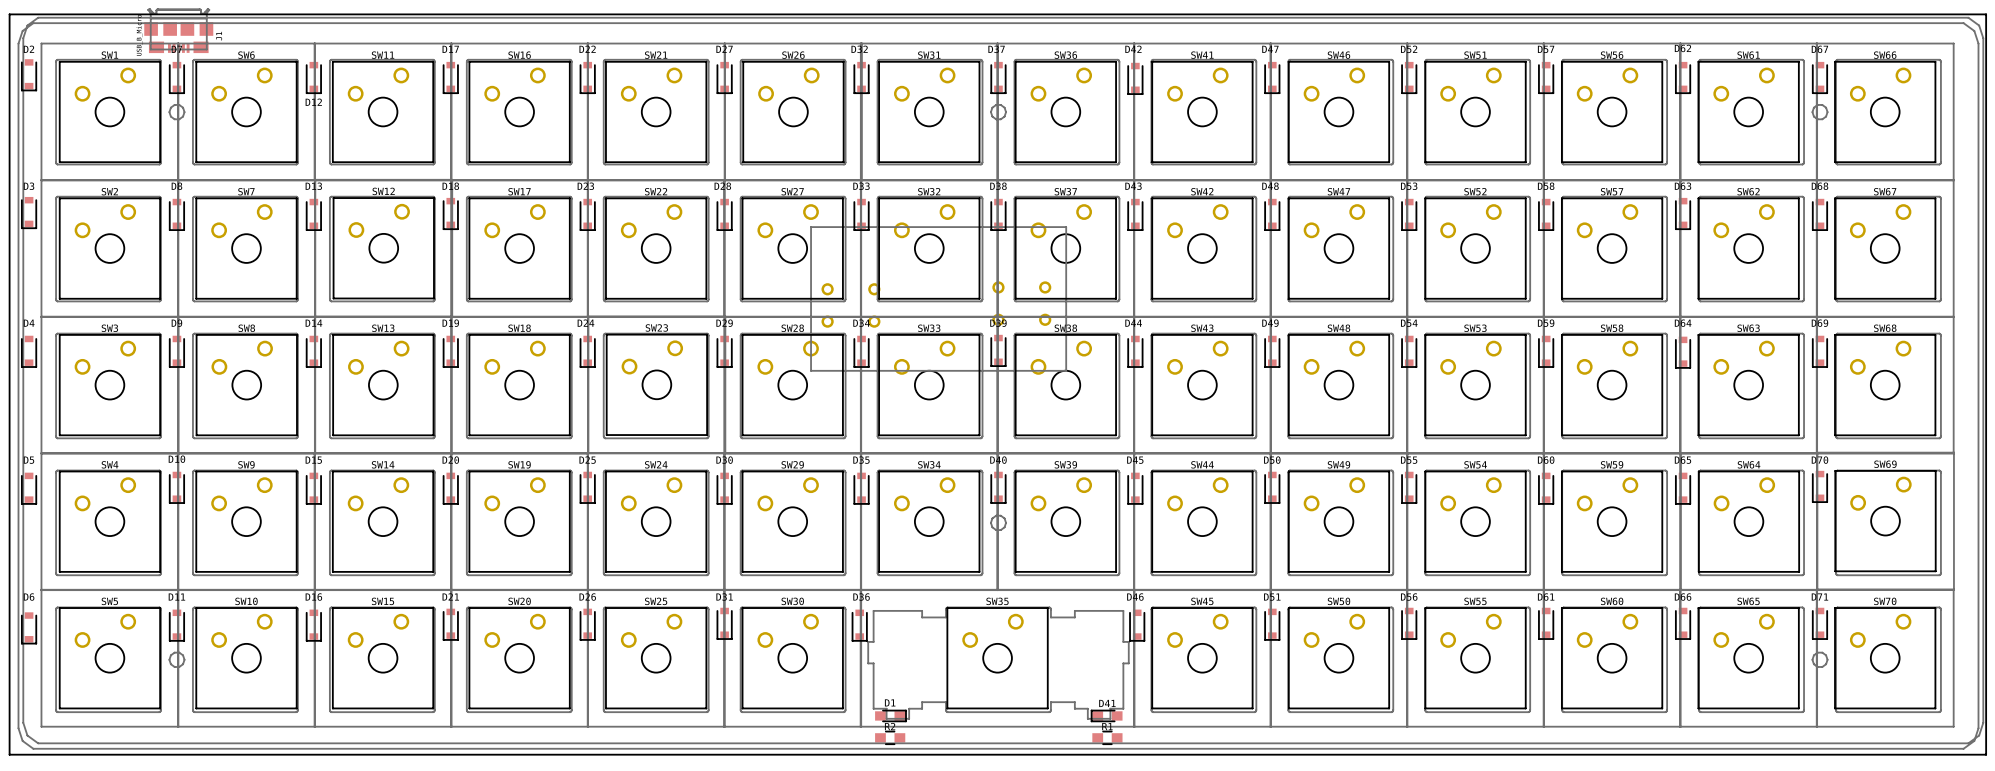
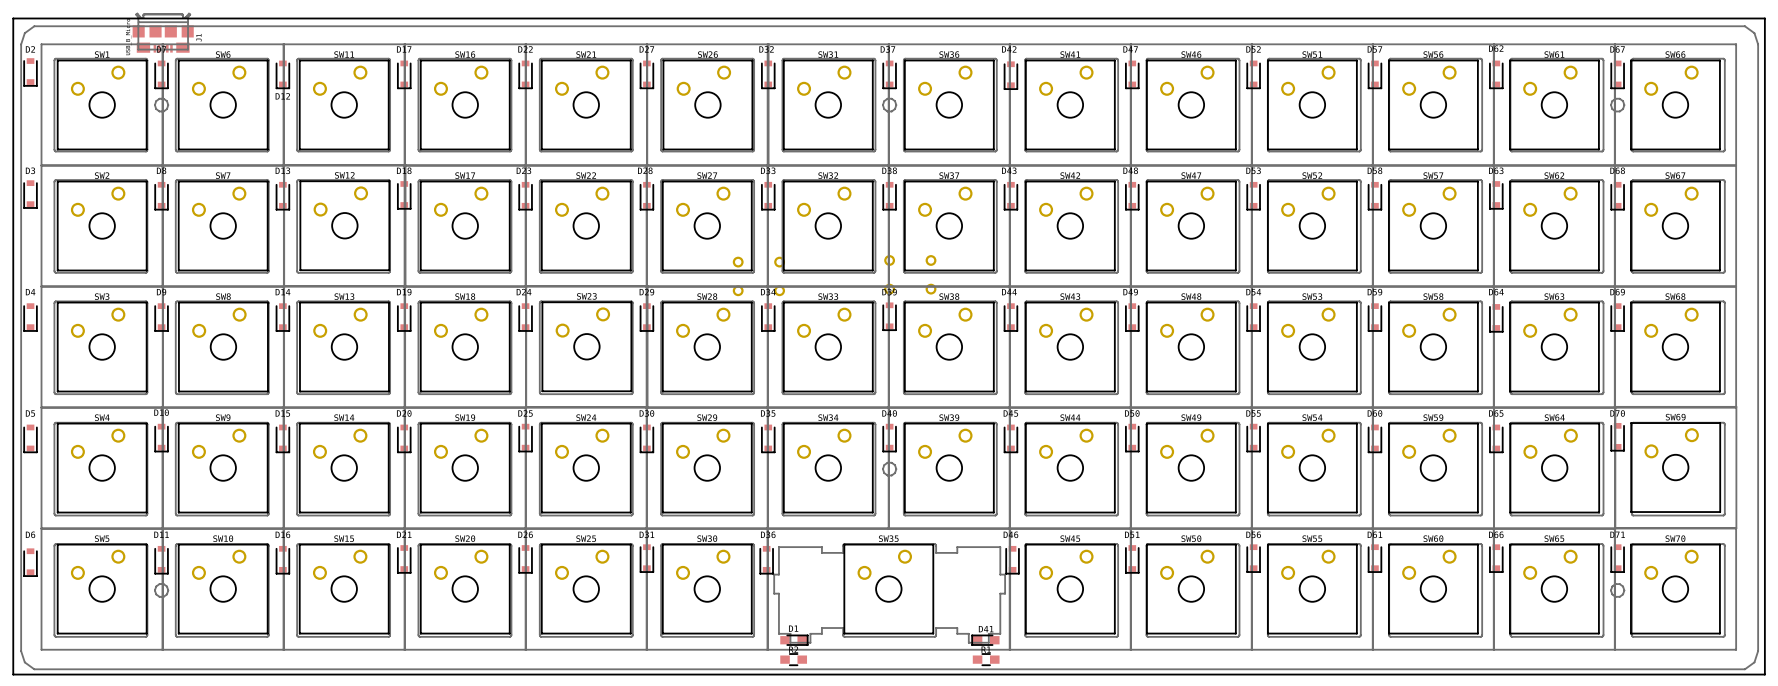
line: (38, 17) (27, 25) (23, 38) (23, 722) (27, 735) (38, 743) (1968, 743) (1979, 735) (1983, 722) (1983, 38) (1979, 25) (1968, 17) (38, 17) -> none
line: (811, 227) (1066, 227) (1066, 370) (811, 370) (811, 227) -> none

